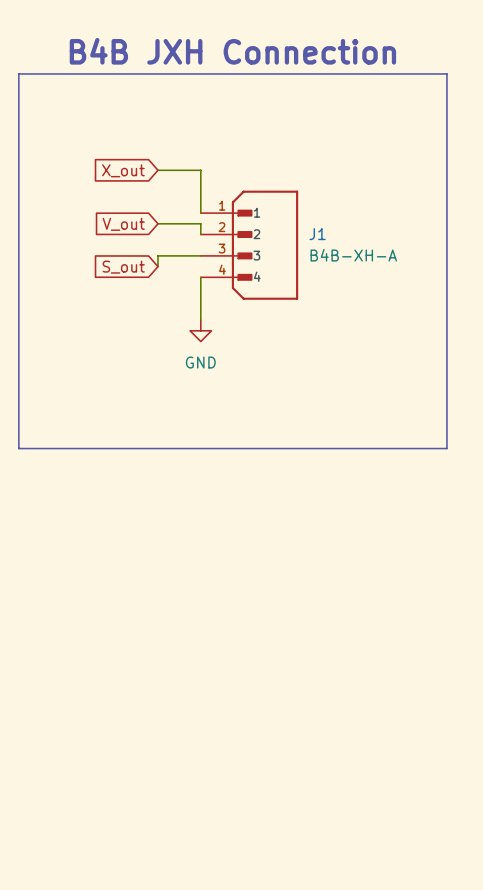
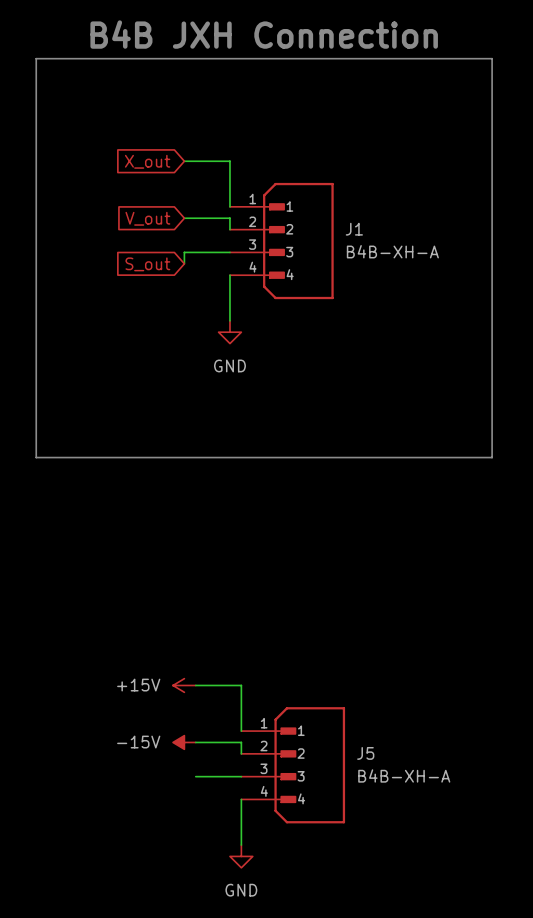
power symbol: none -> +15V (184, 685)
wire: none -> (195, 685) (241, 685) (241, 731)
power symbol: none -> -15V (184, 742)
wire: none -> (195, 742) (241, 742) (241, 753)
J5: none -> B4B-XH-A (293, 765)
wire: none -> (195, 776) (241, 776)
wire: none -> (241, 799) (241, 845)
power symbol: none -> GND (241, 856)

